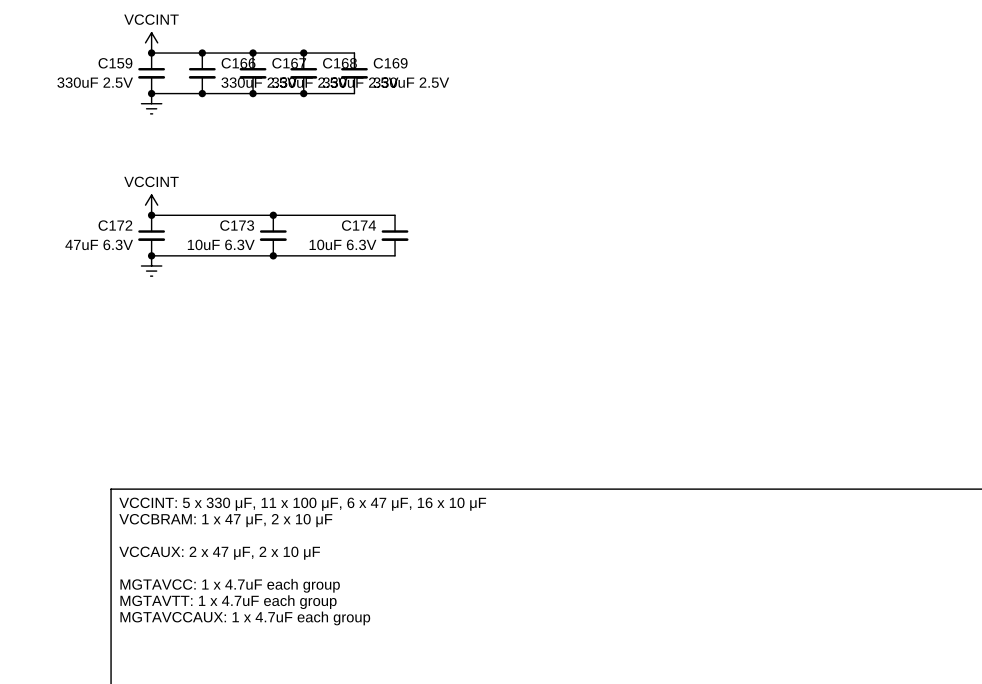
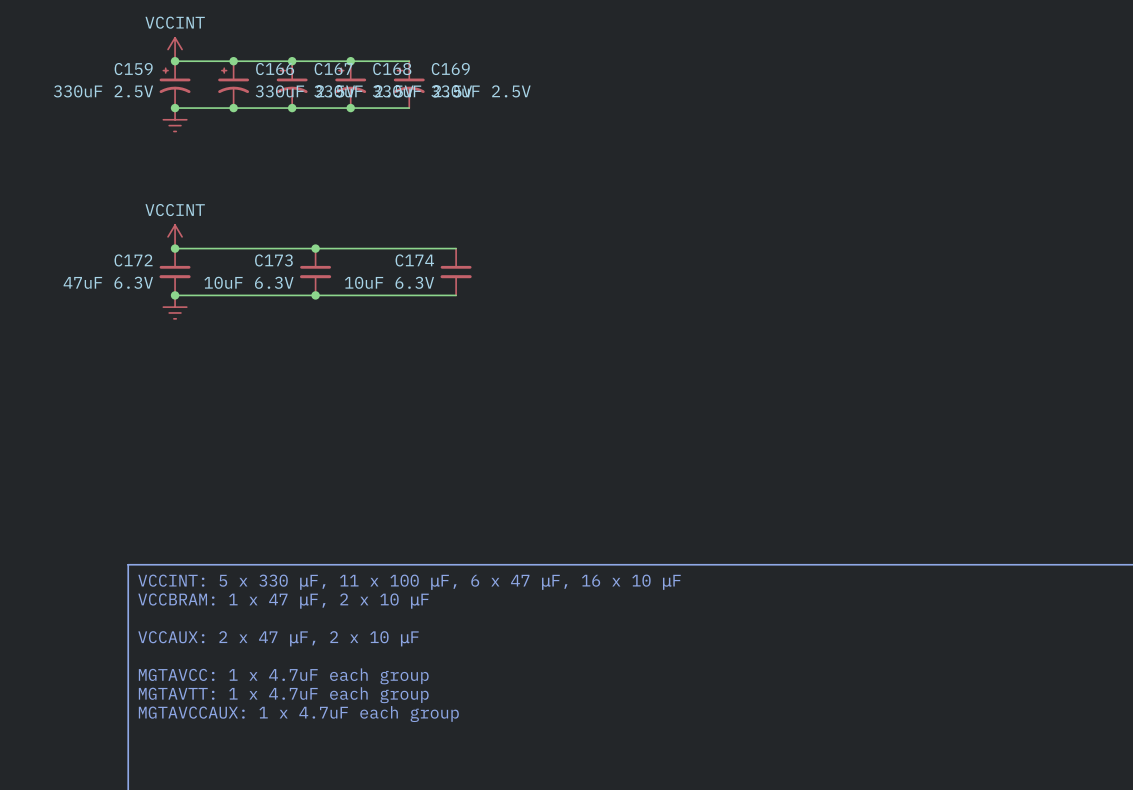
C159 symbol: [138, 53, 166, 94] -> [159, 61, 191, 109]
C166 symbol: [188, 53, 216, 94] -> [218, 61, 250, 109]
C167 symbol: [239, 53, 267, 94] -> [276, 61, 308, 109]
C168 symbol: [290, 53, 318, 94] -> [335, 61, 367, 109]
C169 symbol: [340, 53, 368, 94] -> [393, 61, 425, 109]

